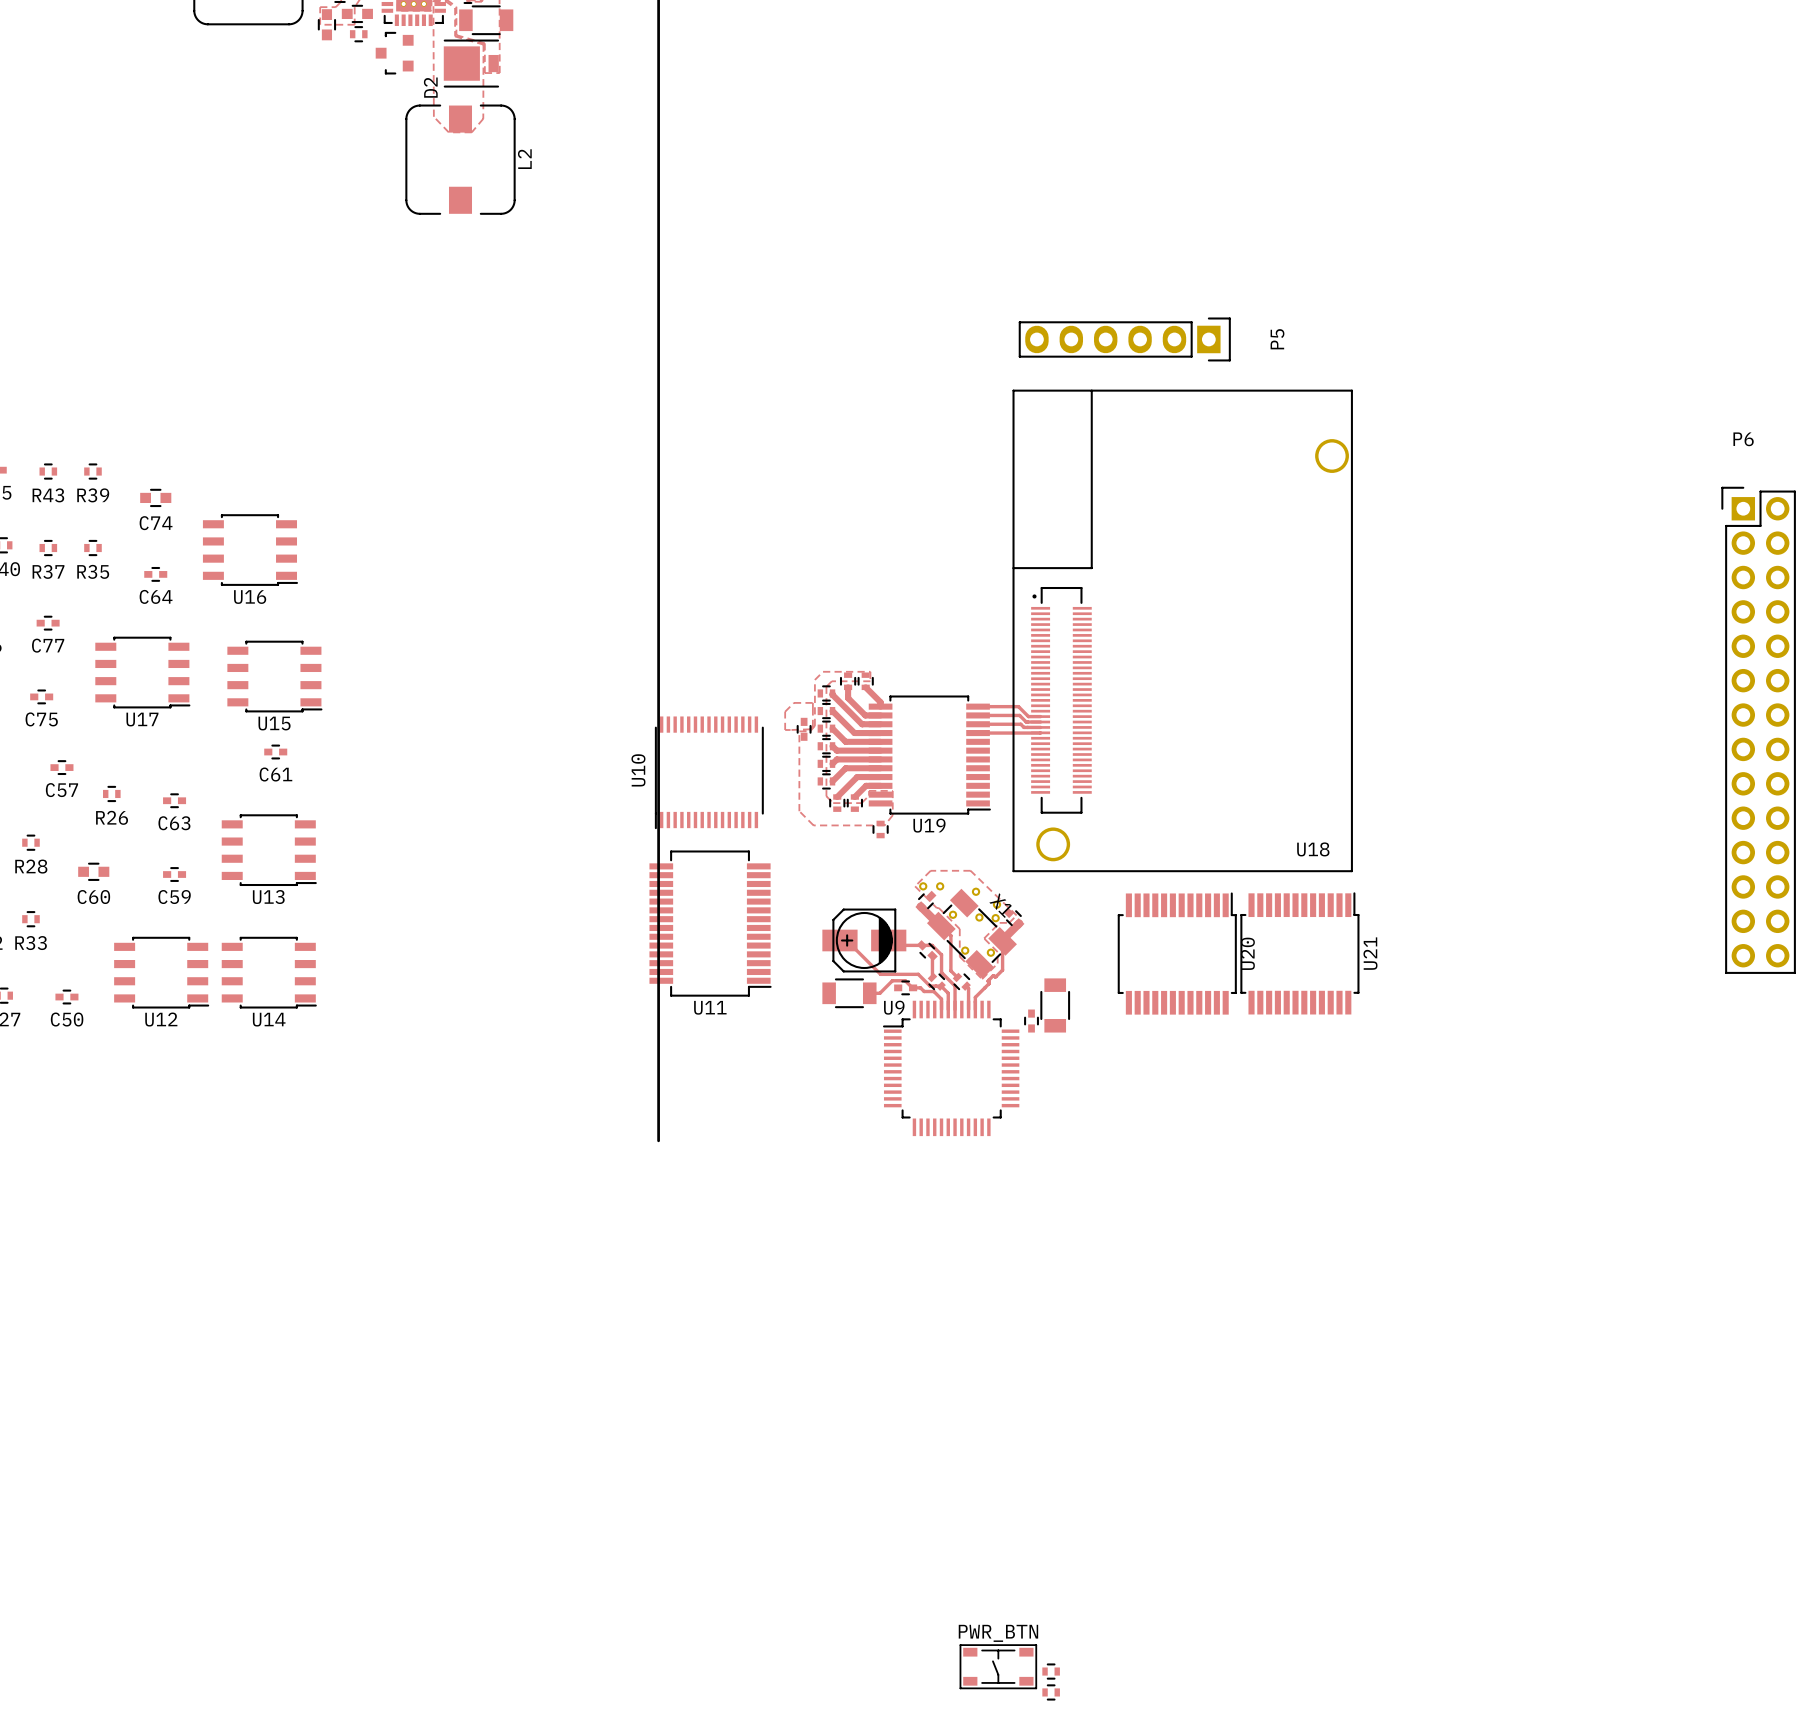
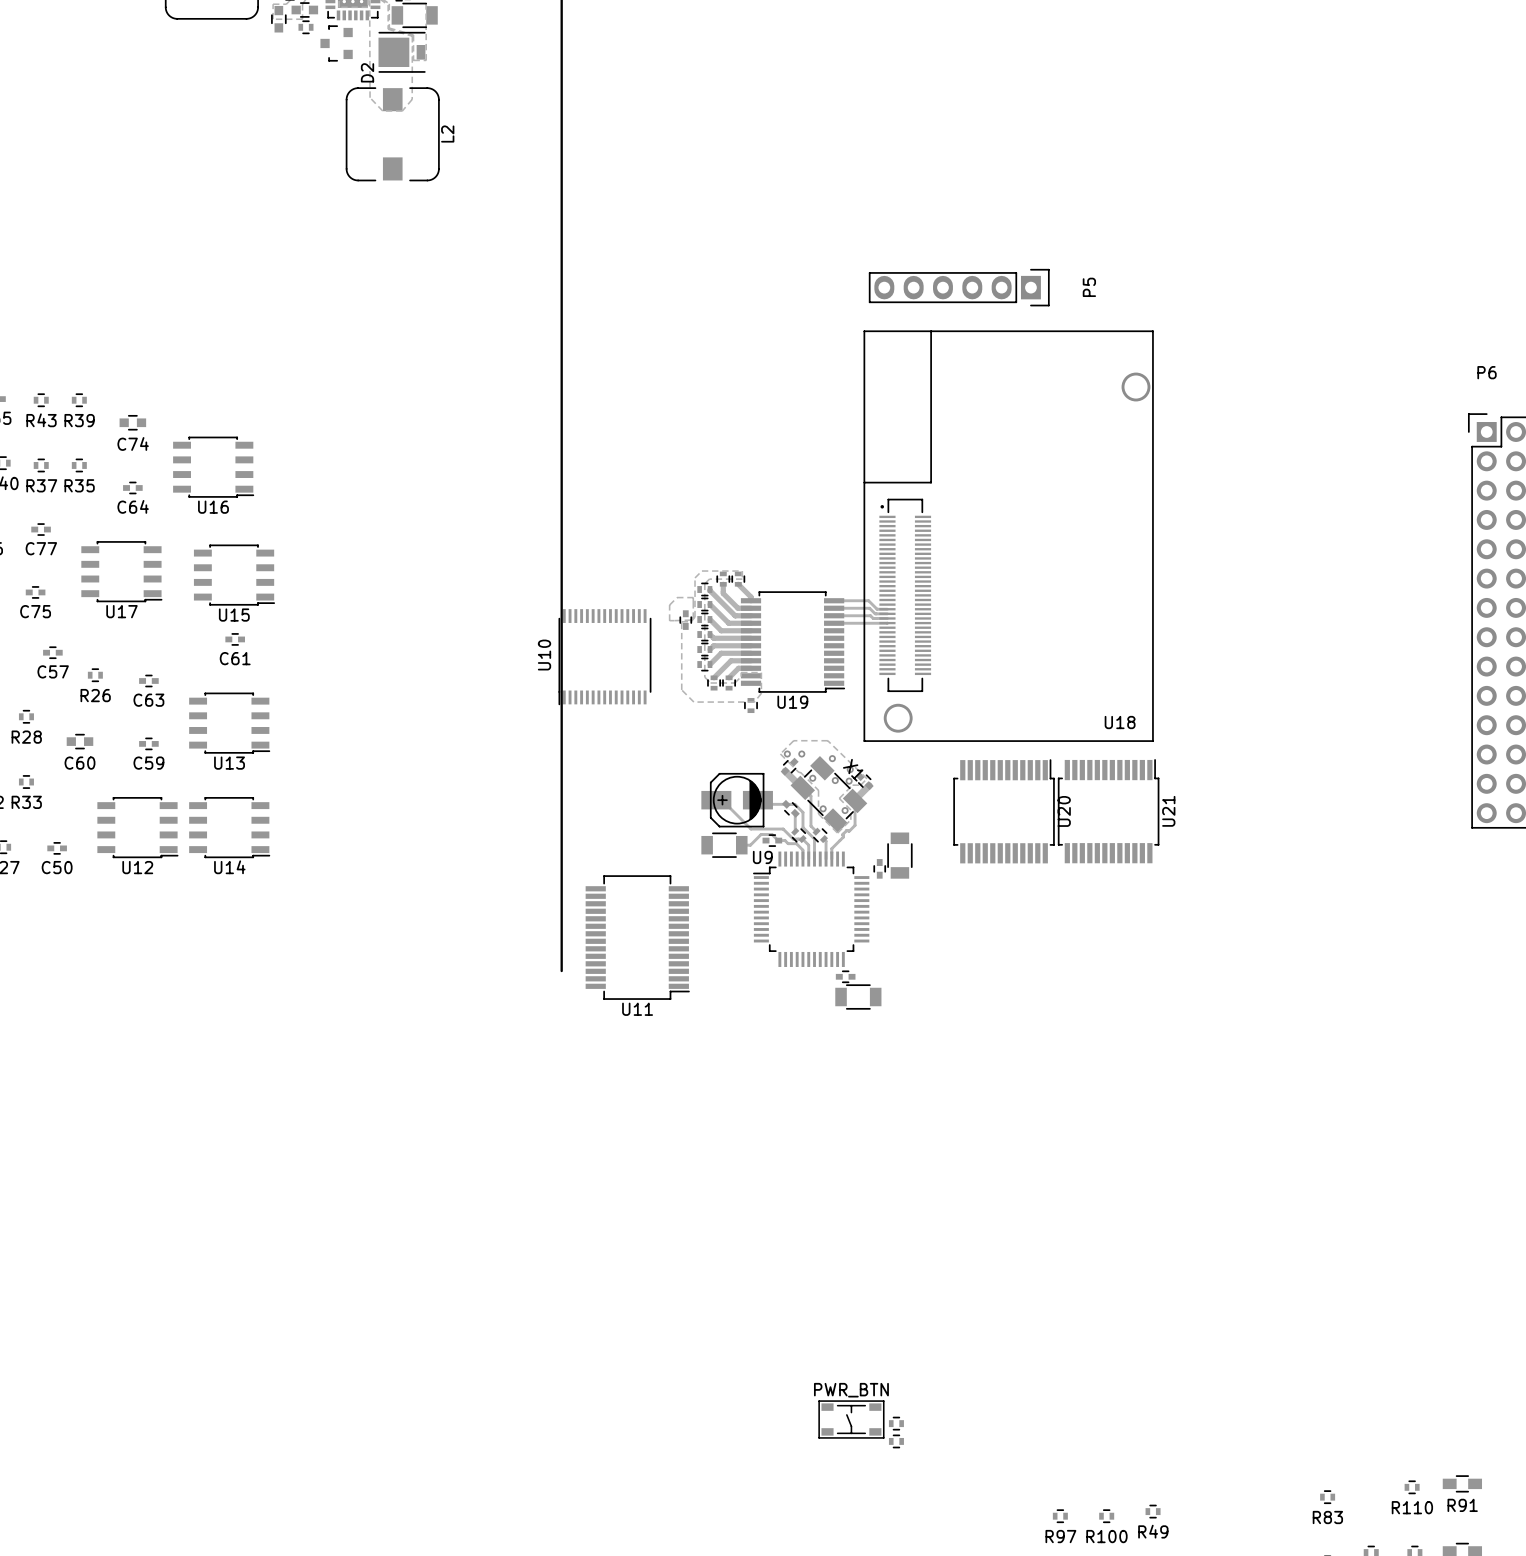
U11 position: (710, 923) -> (637, 937)
part: none -> (845, 976)
part: none -> (858, 997)

